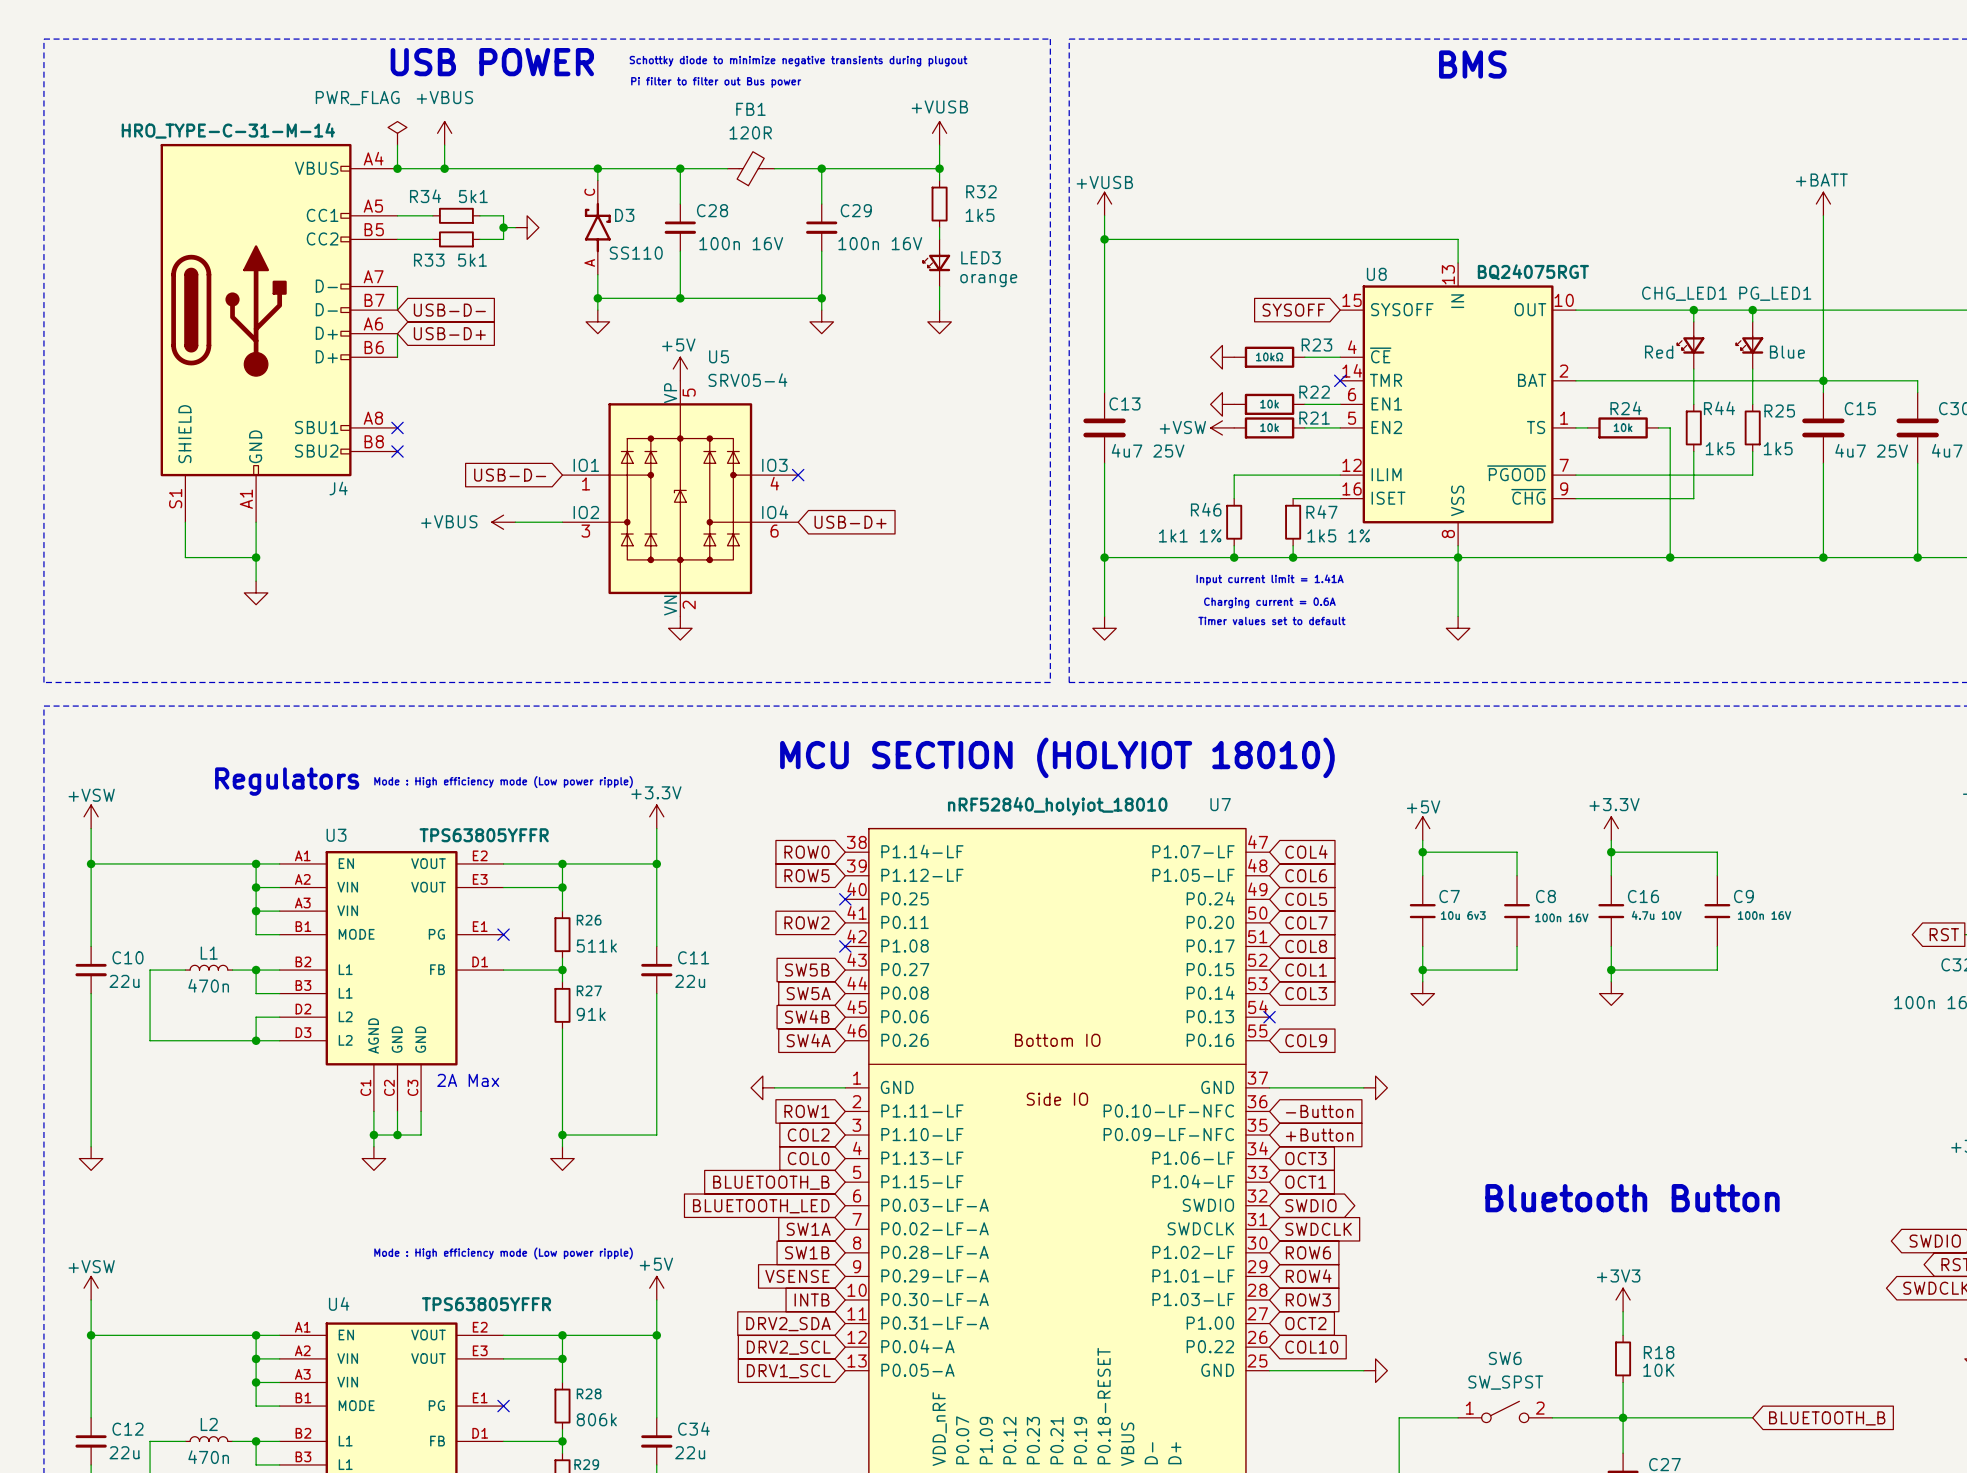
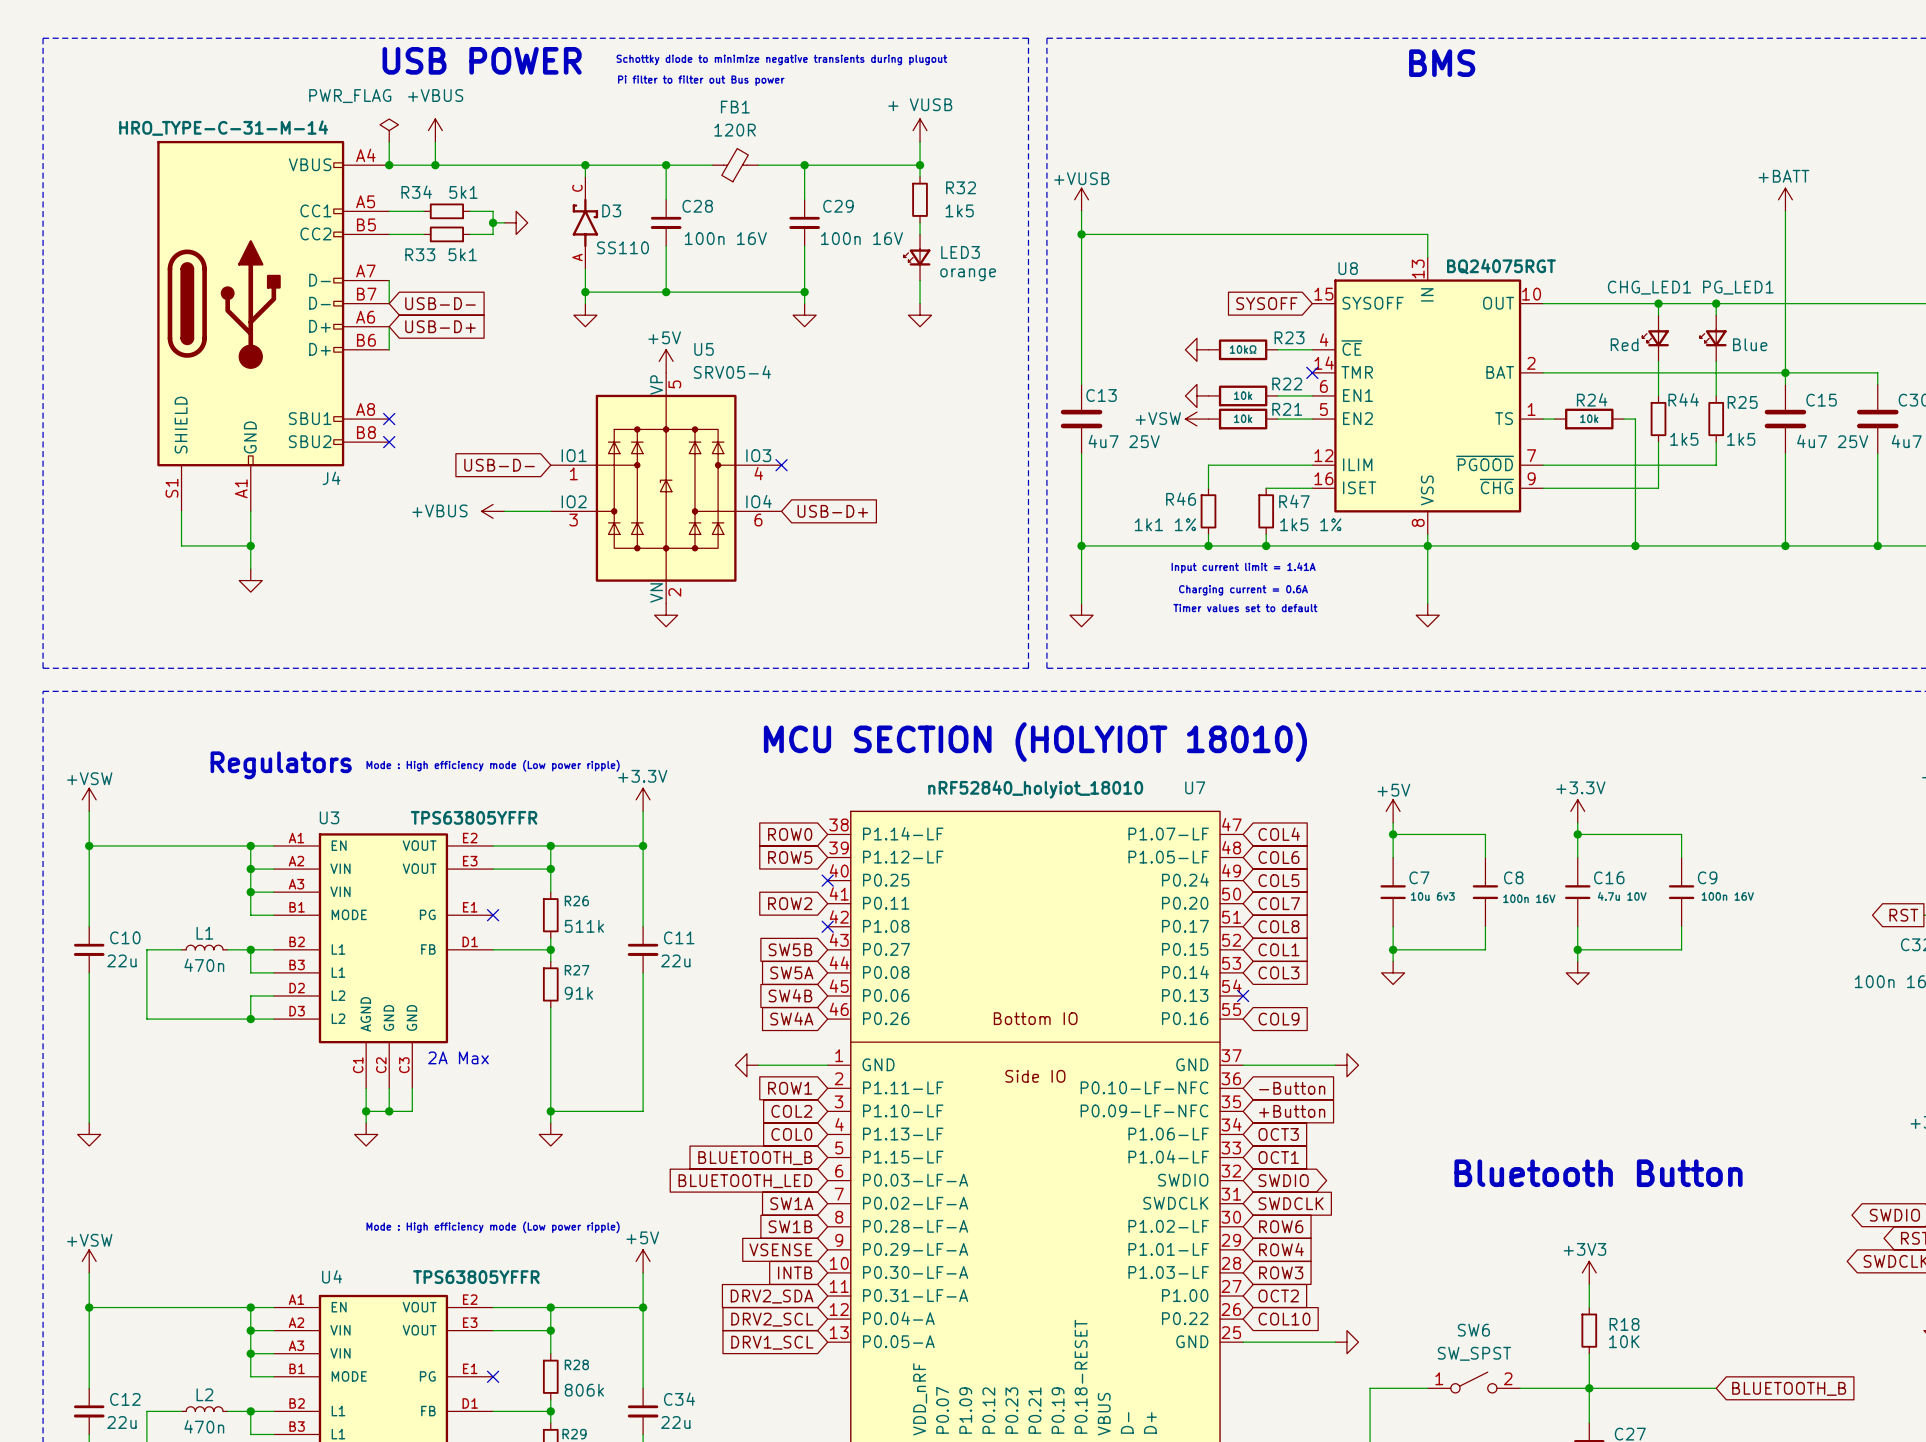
power symbol: +VUSB (939, 133) -> + VUSB (920, 130)

